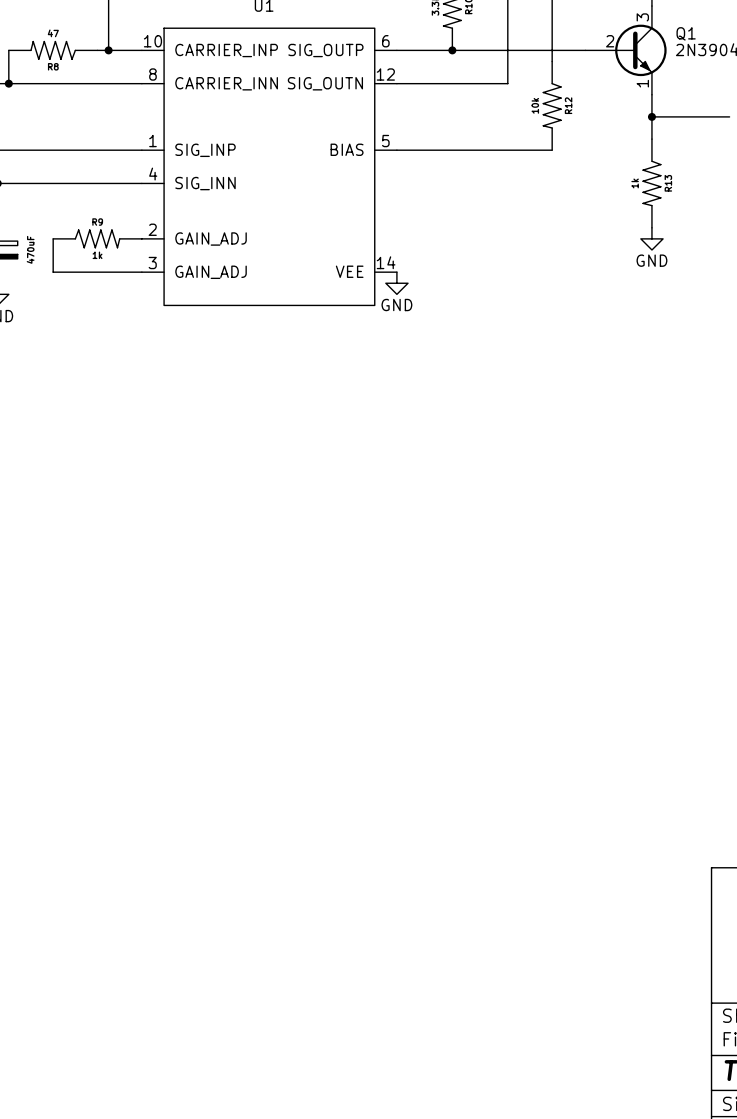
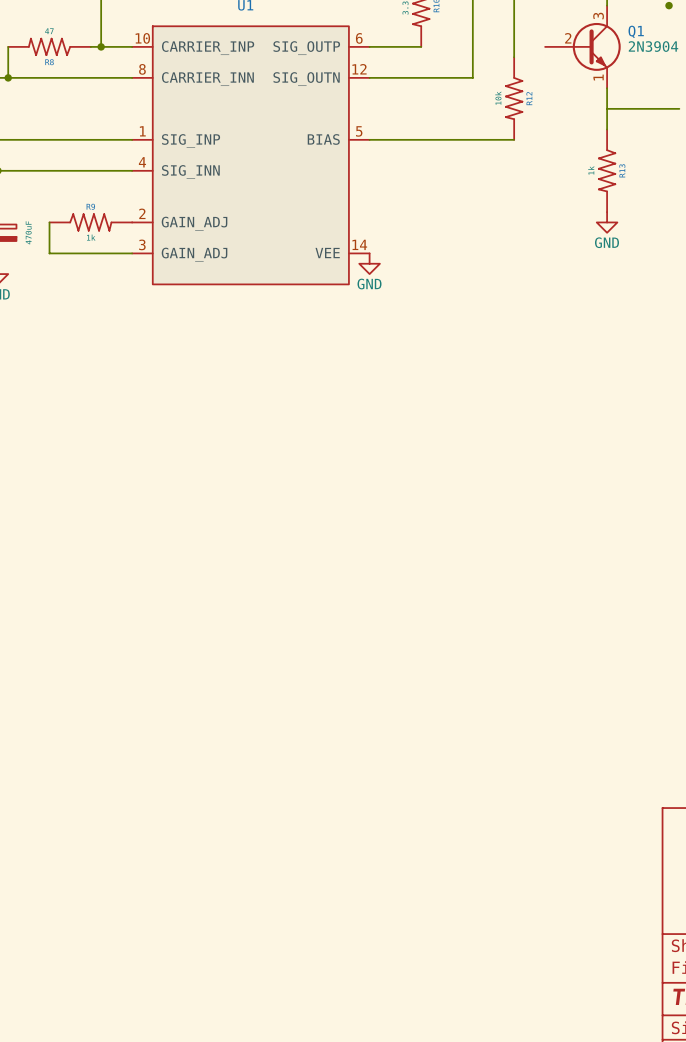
junction: none -> (669, 5)
wire: (452, 50) (585, 50) -> none
junction: (452, 50) -> none
junction: (651, 116) -> none

